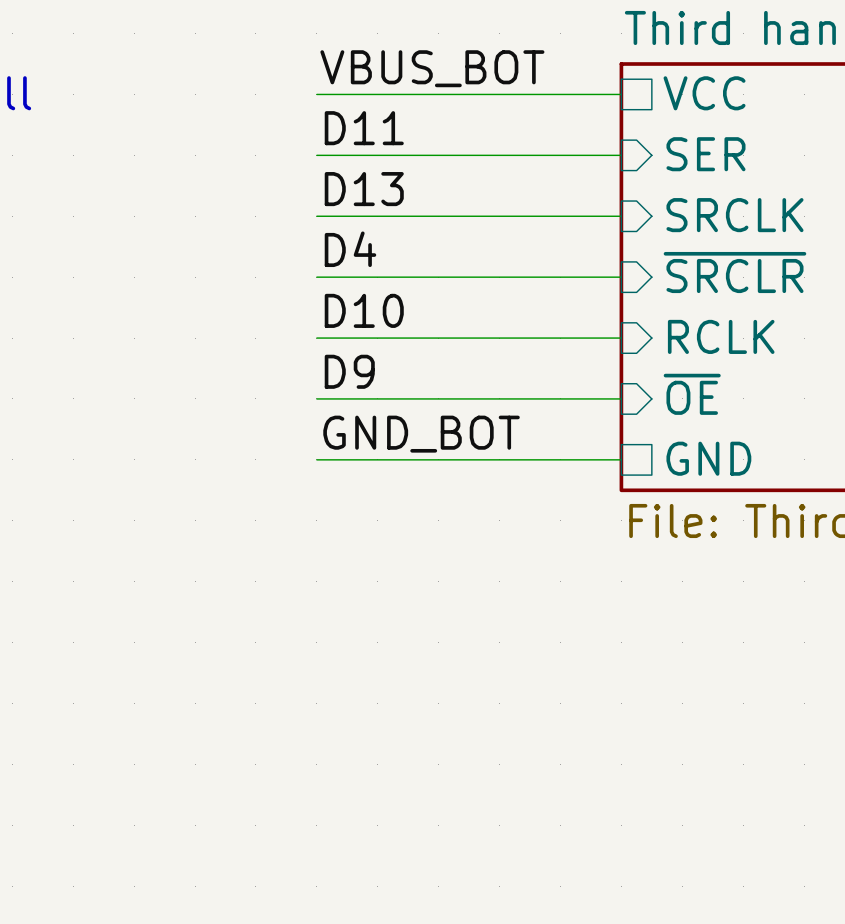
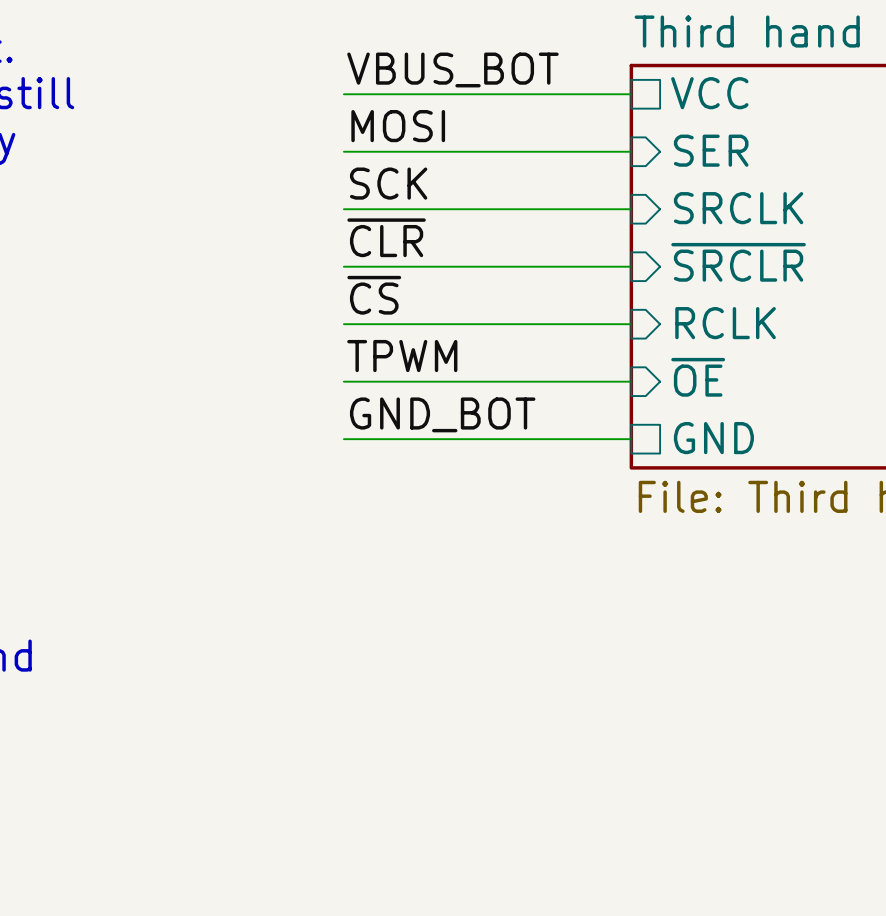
label: D11 (364, 128) -> MOSI (398, 126)
label: D13 (364, 189) -> SCK (388, 183)
label: D4 (350, 249) -> ~{CLR} (386, 237)
label: D10 (364, 310) -> ~{CS} (374, 295)
label: D9 (349, 371) -> TPWM (402, 356)

